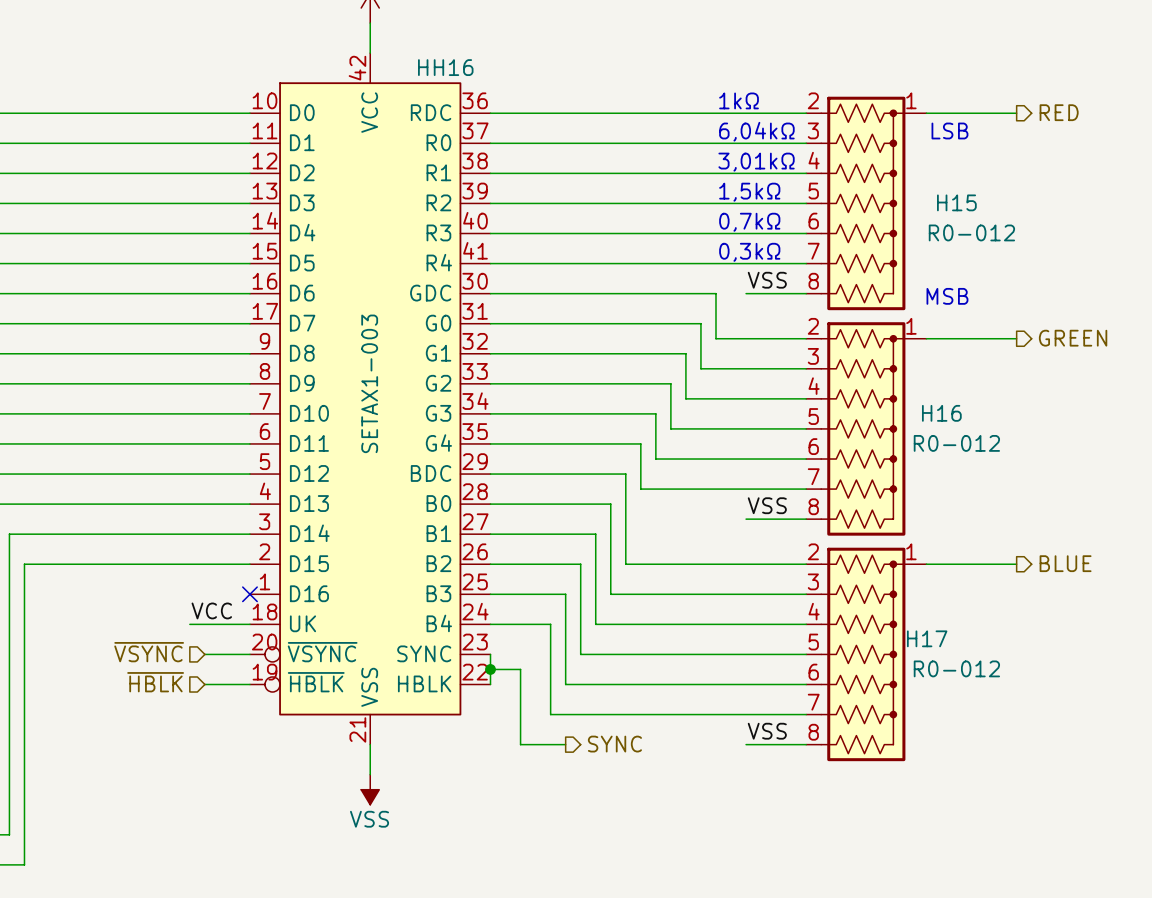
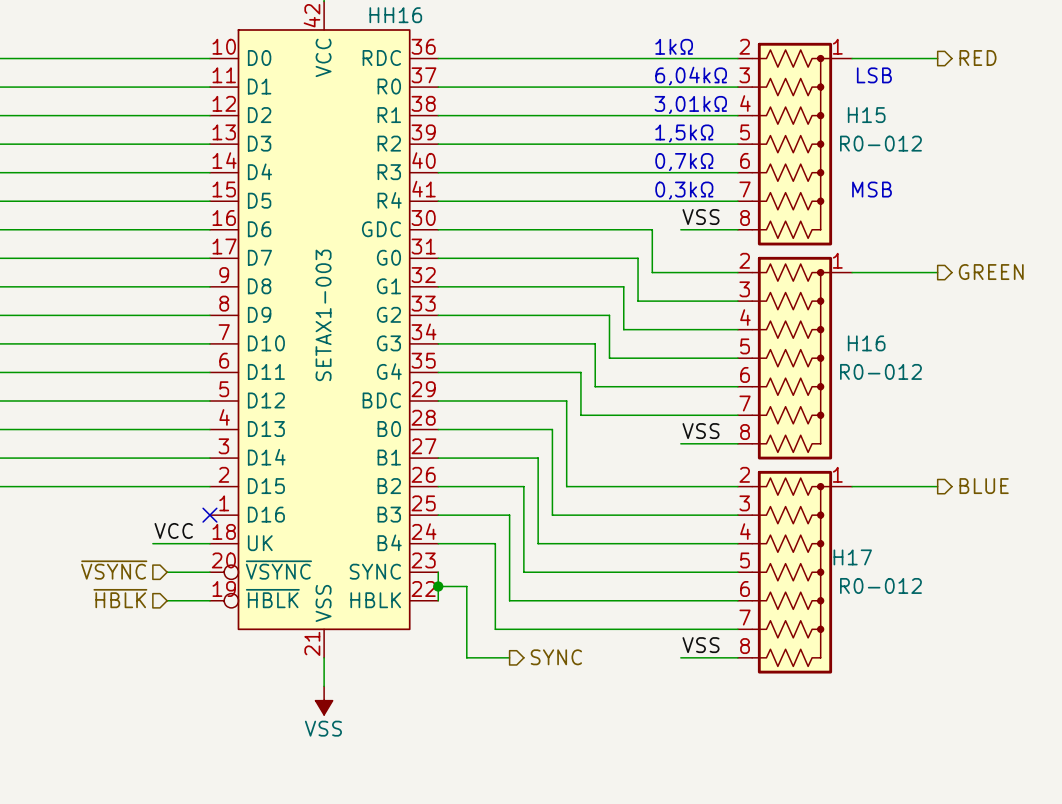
H15 name position: H15 (956, 202) -> H15 (866, 115)
H15 value position: R0-012 (971, 232) -> R0-012 (880, 143)
text position: MSB (947, 296) -> MSB (872, 189)

